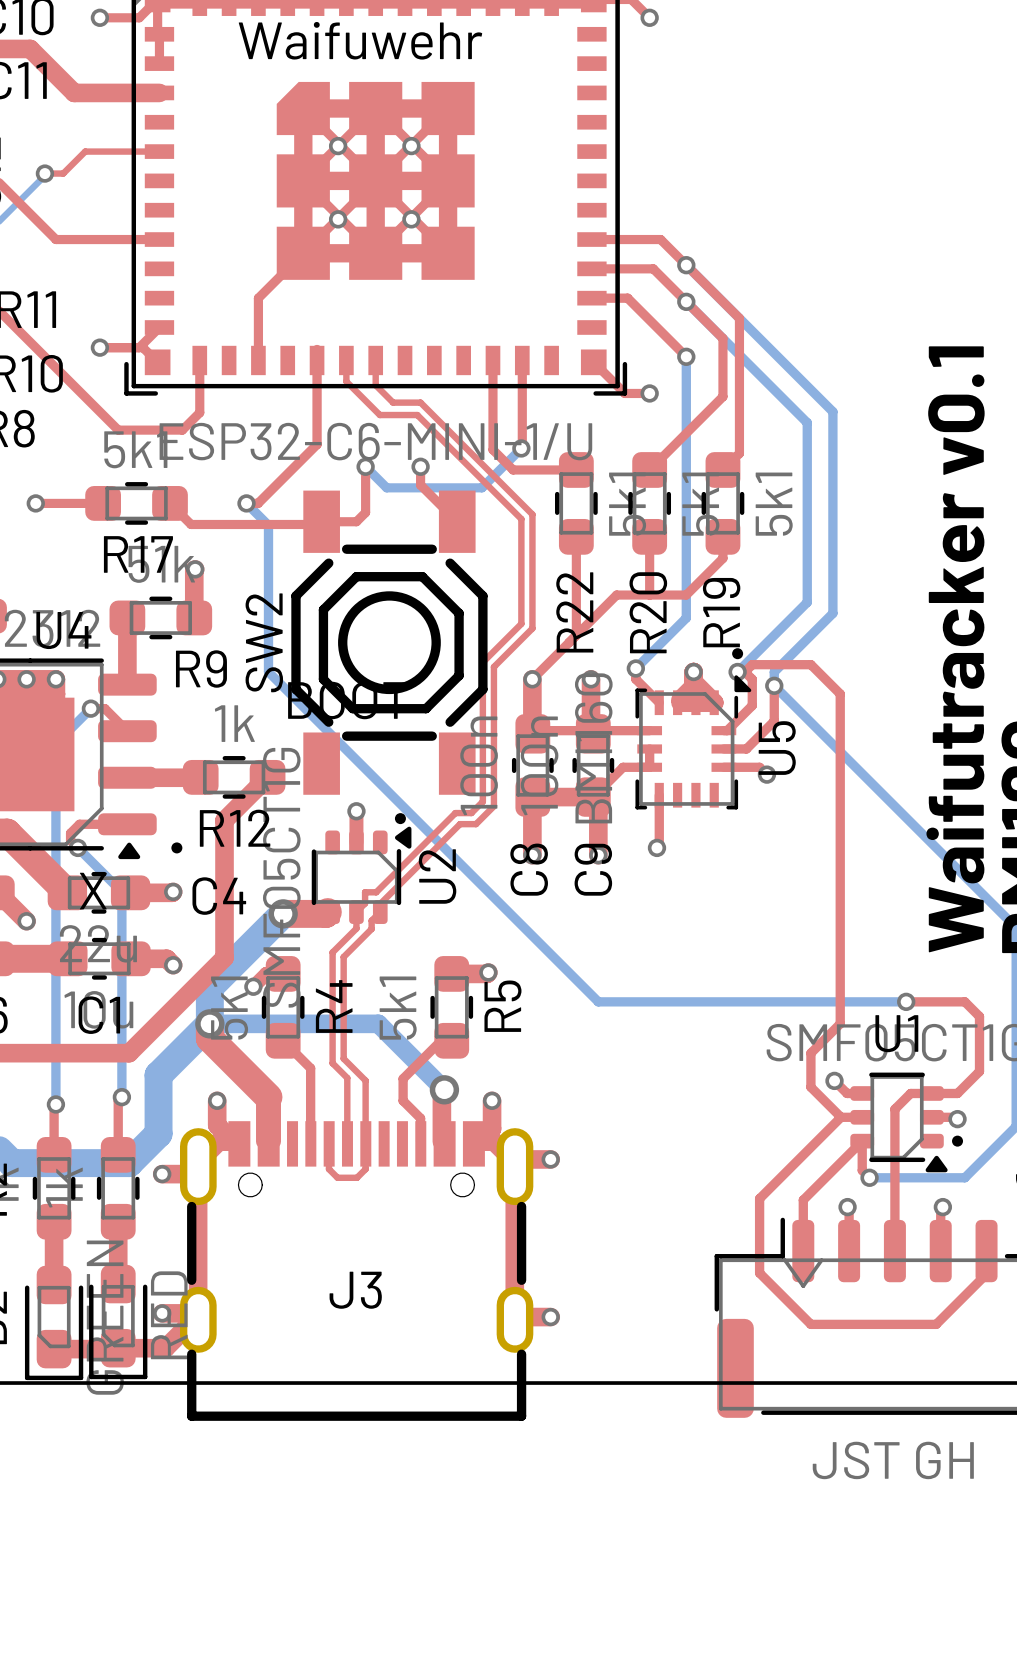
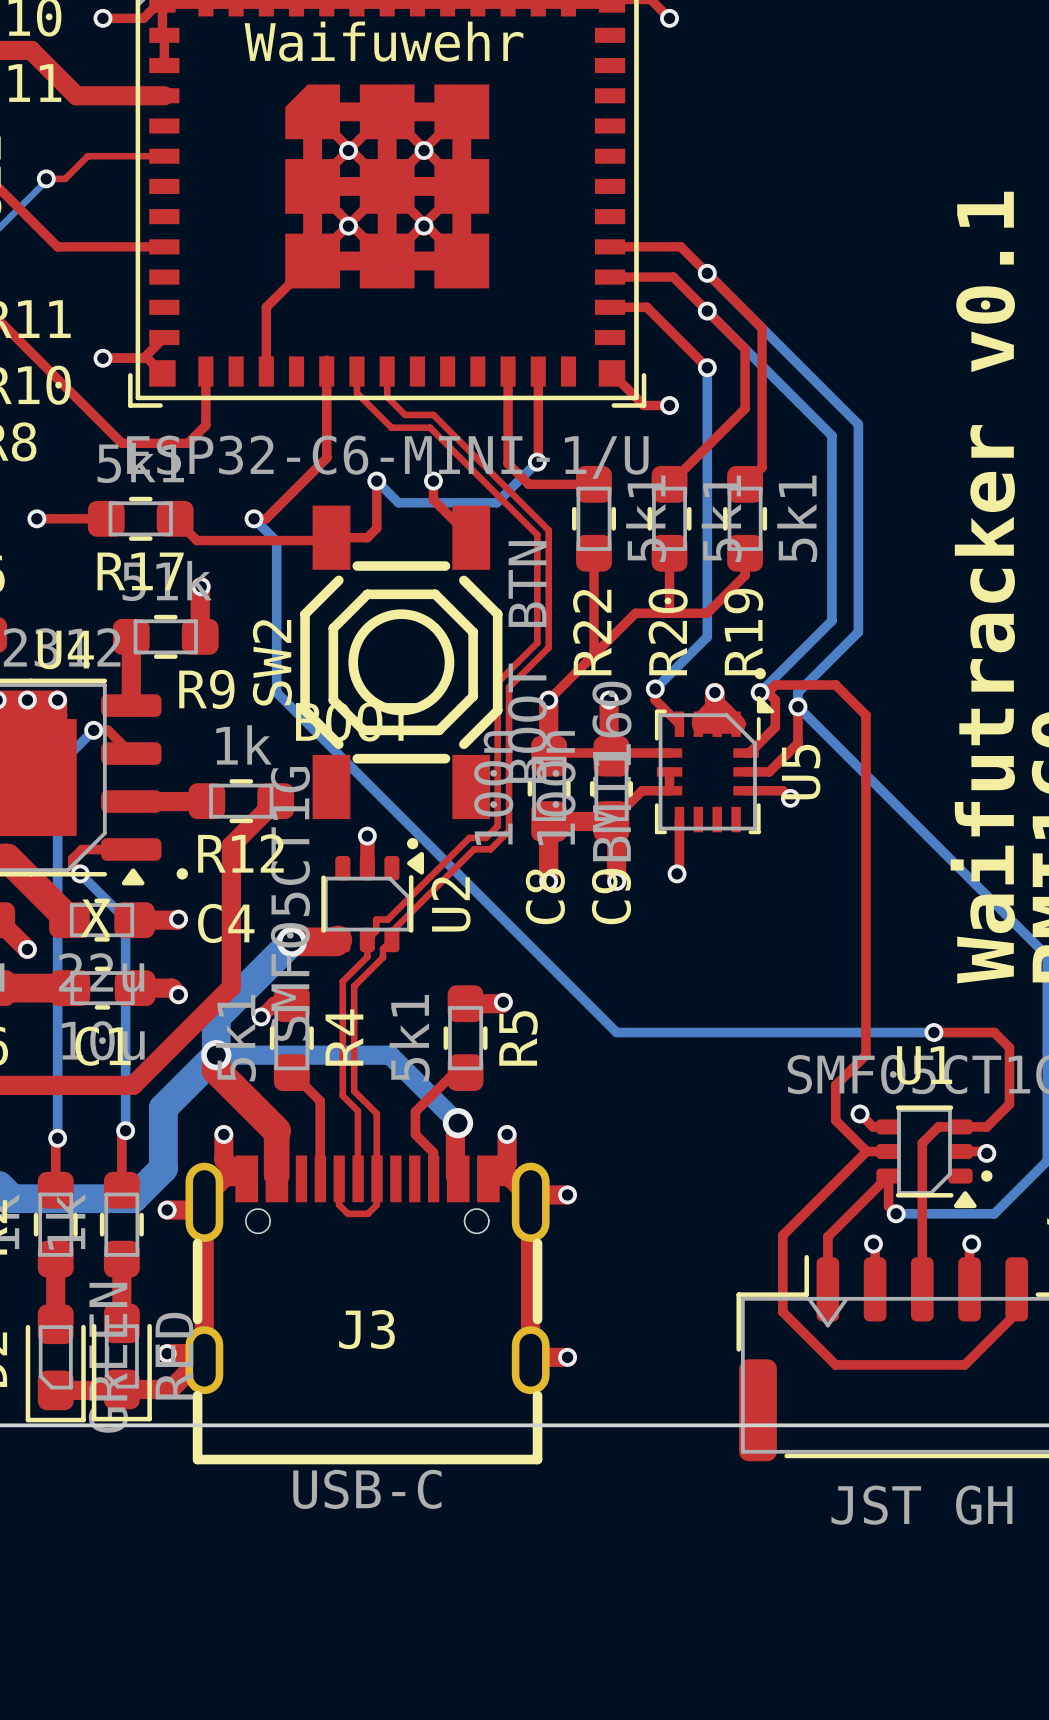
SW2 value: none -> BOOT BTN (527, 662)
J3 value: none -> USB-C (367, 1489)

